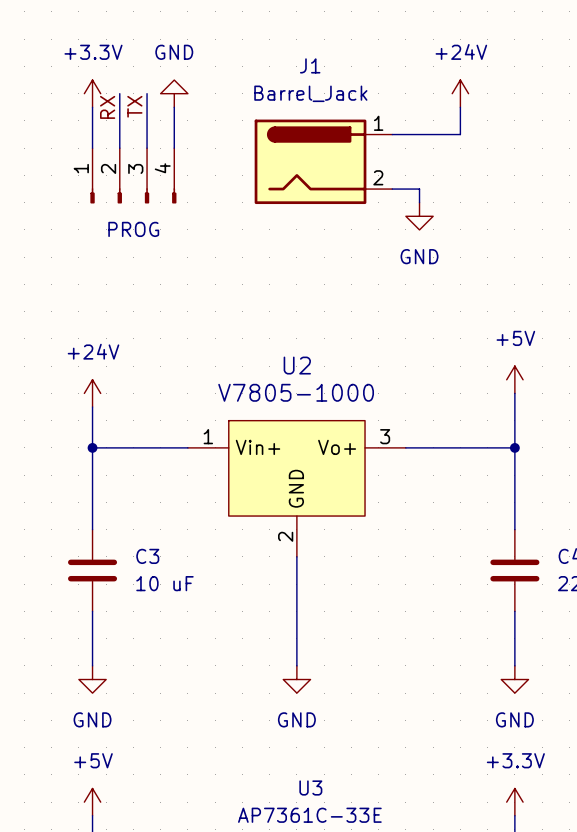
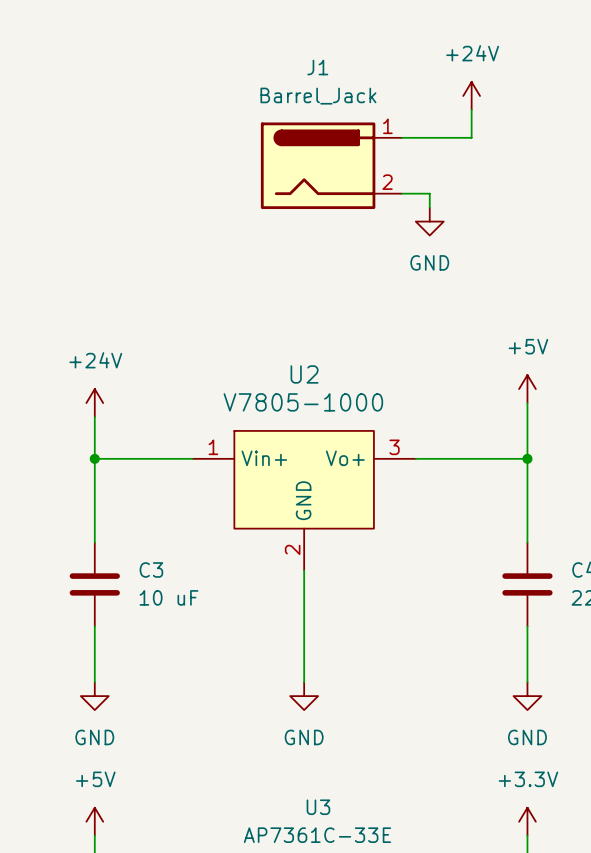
power symbol: +3.3V (92, 93) -> none
wire: (119, 93) (119, 148) -> none
wire: (147, 93) (147, 148) -> none
power symbol: GND (174, 93) -> none
label: TX (134, 106) -> none
wire: (92, 107) (92, 148) -> none
label: RX (107, 107) -> none
wire: (174, 107) (174, 148) -> none
part: PROG (133, 175) -> none

